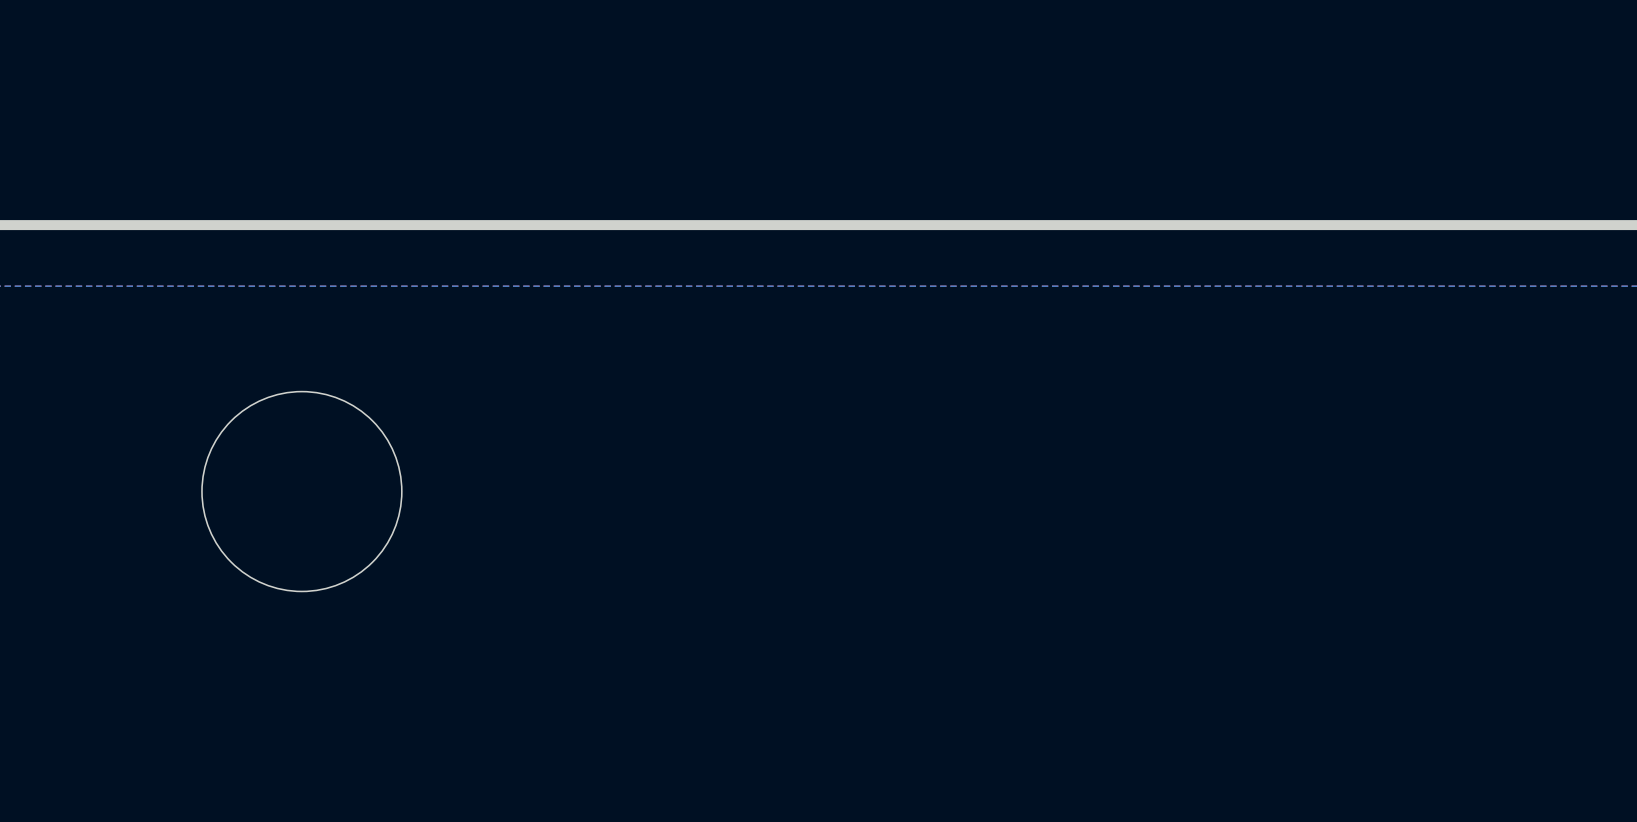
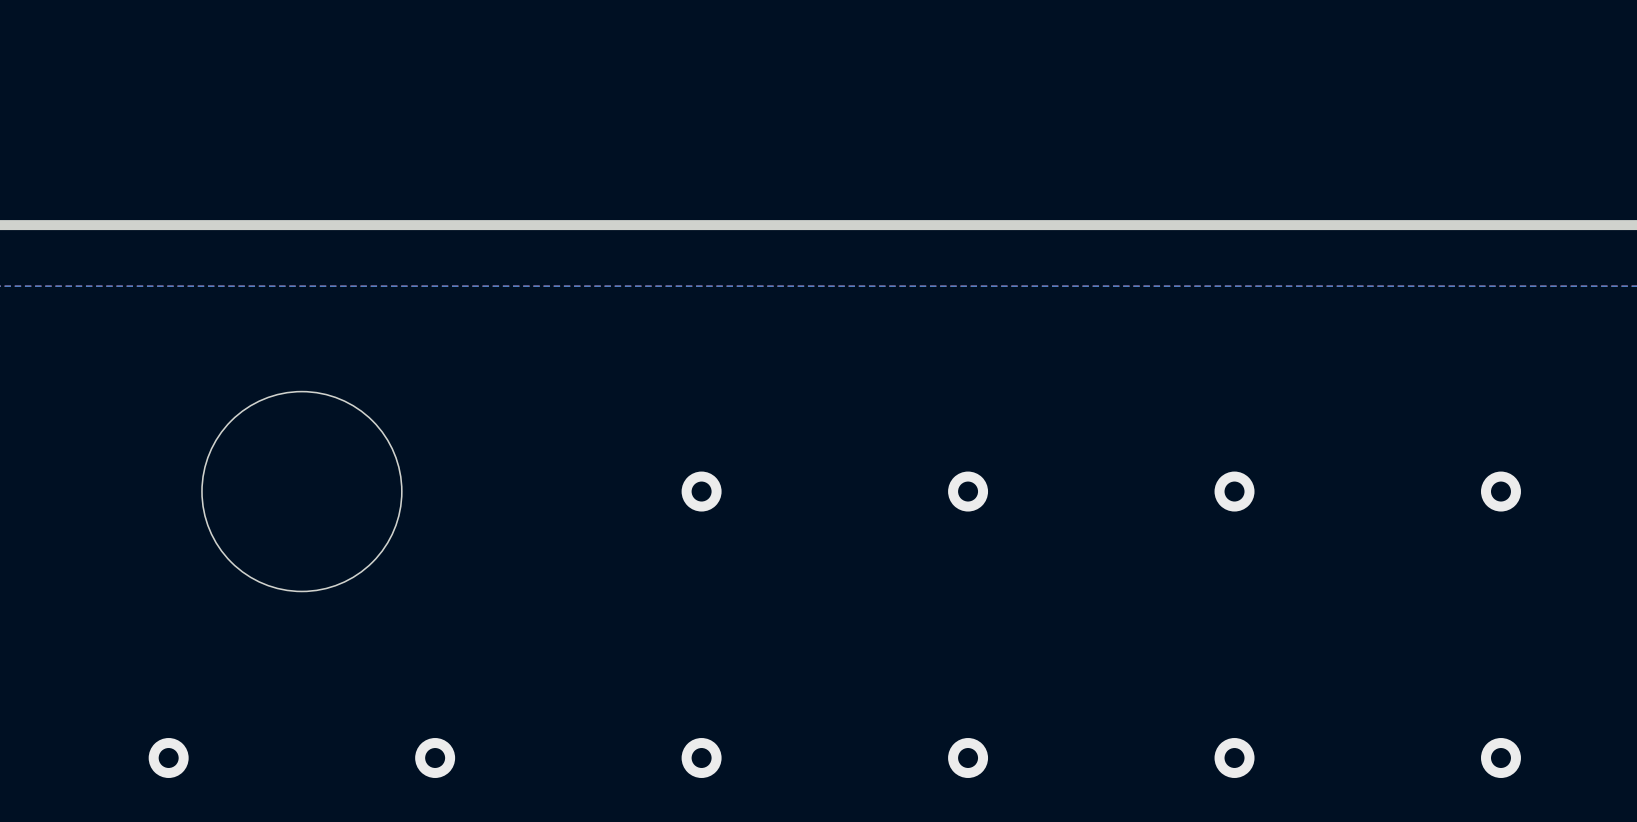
via: none -> (701, 491)
via: none -> (968, 491)
via: none -> (1234, 491)
via: none -> (1500, 491)
via: none -> (168, 758)
via: none -> (435, 758)
via: none -> (701, 758)
via: none -> (968, 758)
via: none -> (1234, 758)
via: none -> (1500, 758)

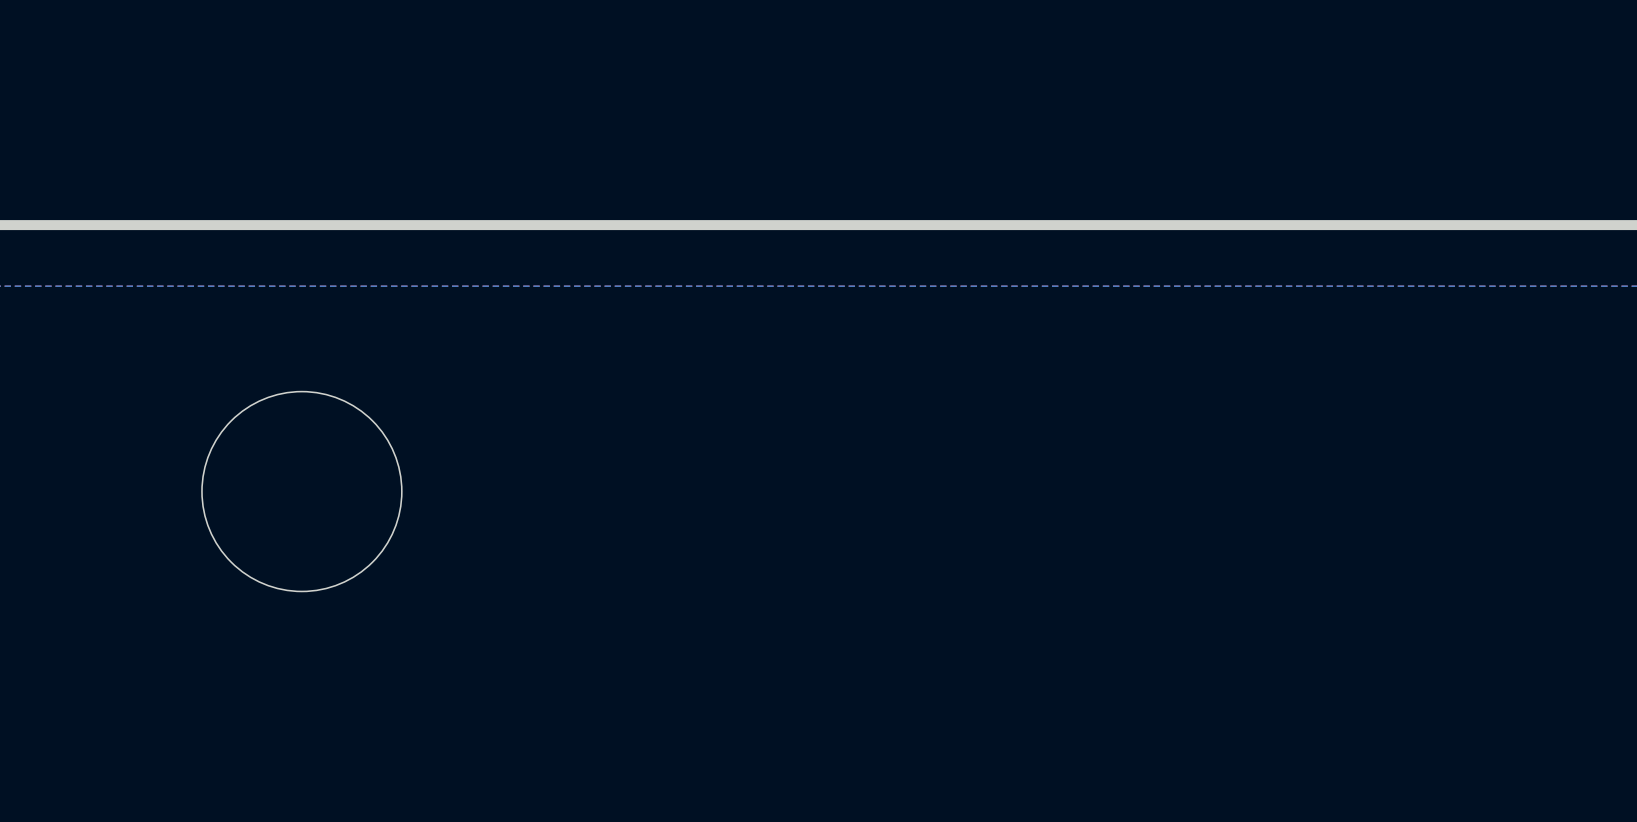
via: (701, 491) -> none
via: (968, 491) -> none
via: (1234, 491) -> none
via: (1500, 491) -> none
via: (168, 758) -> none
via: (435, 758) -> none
via: (701, 758) -> none
via: (968, 758) -> none
via: (1234, 758) -> none
via: (1500, 758) -> none

